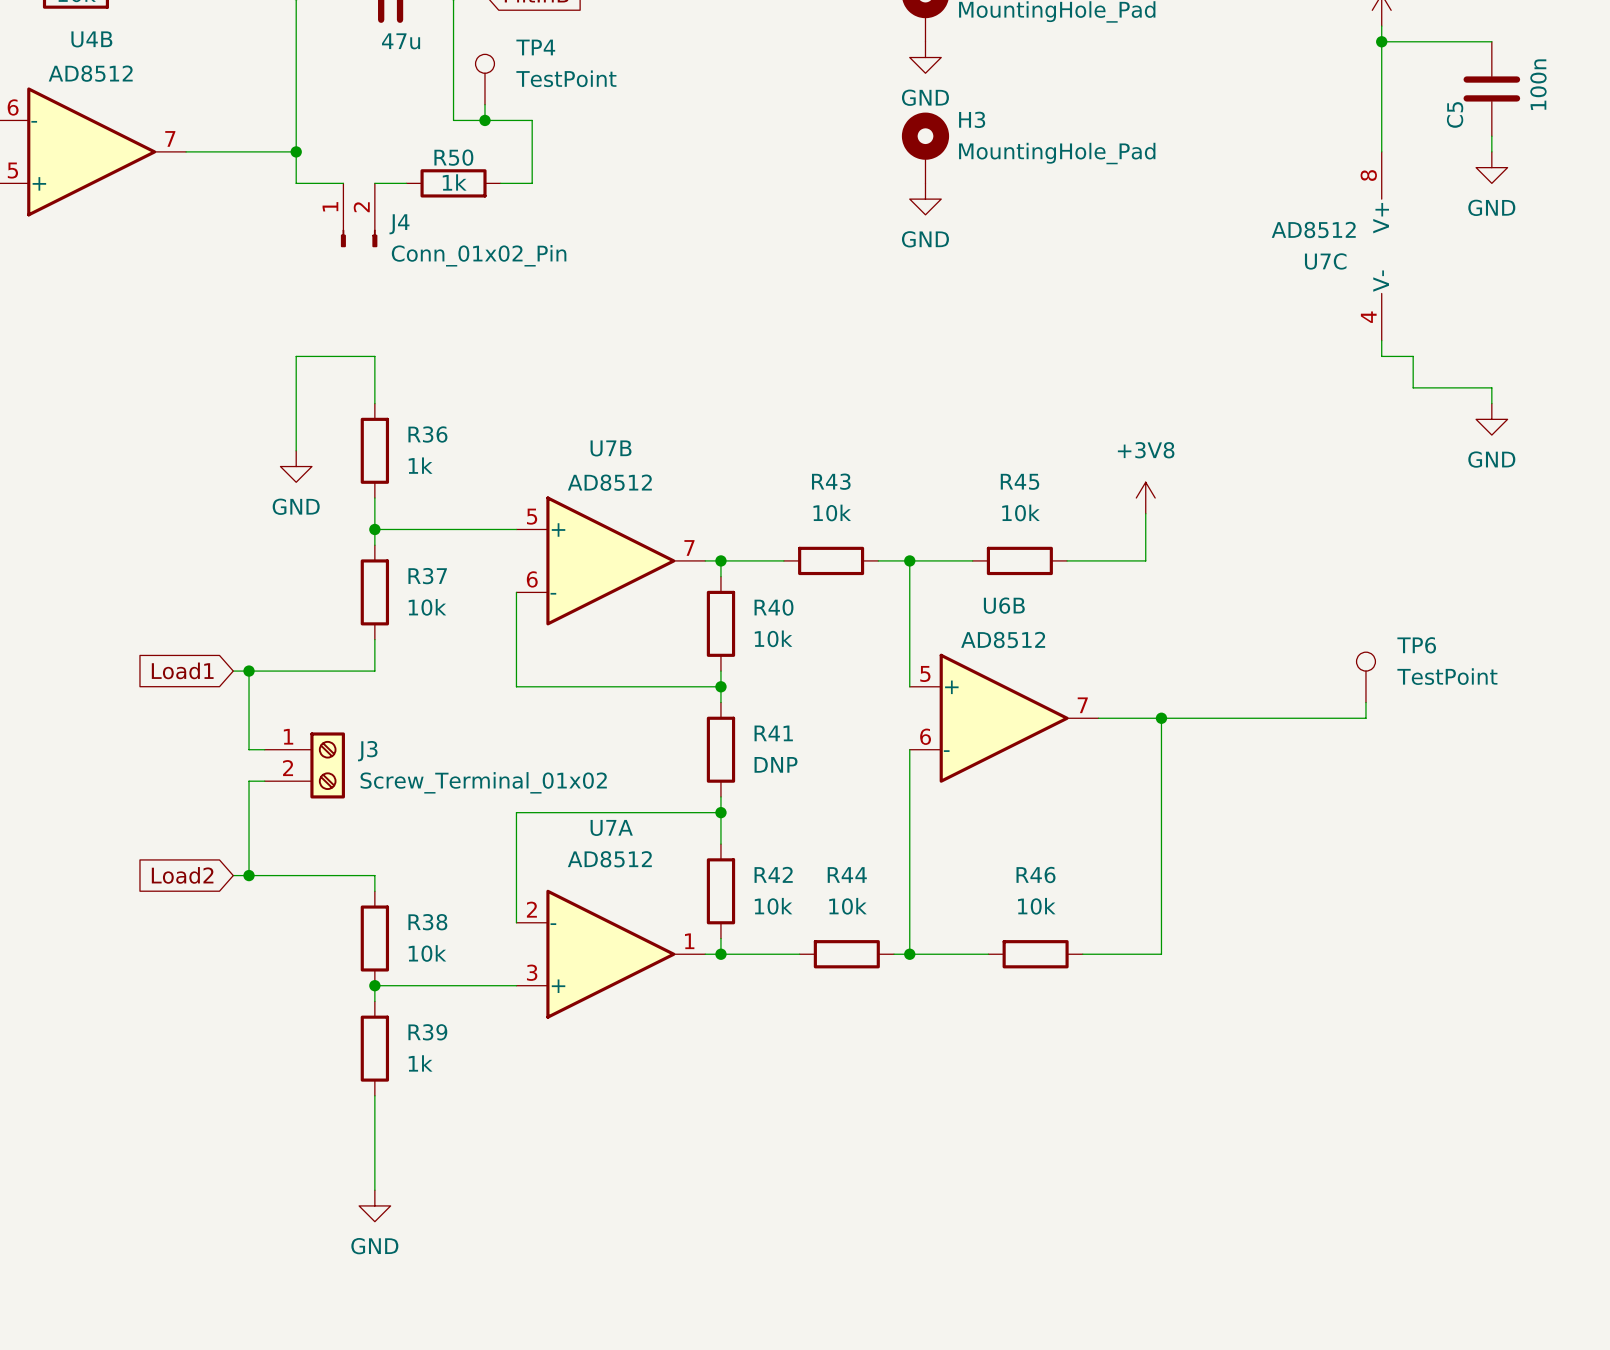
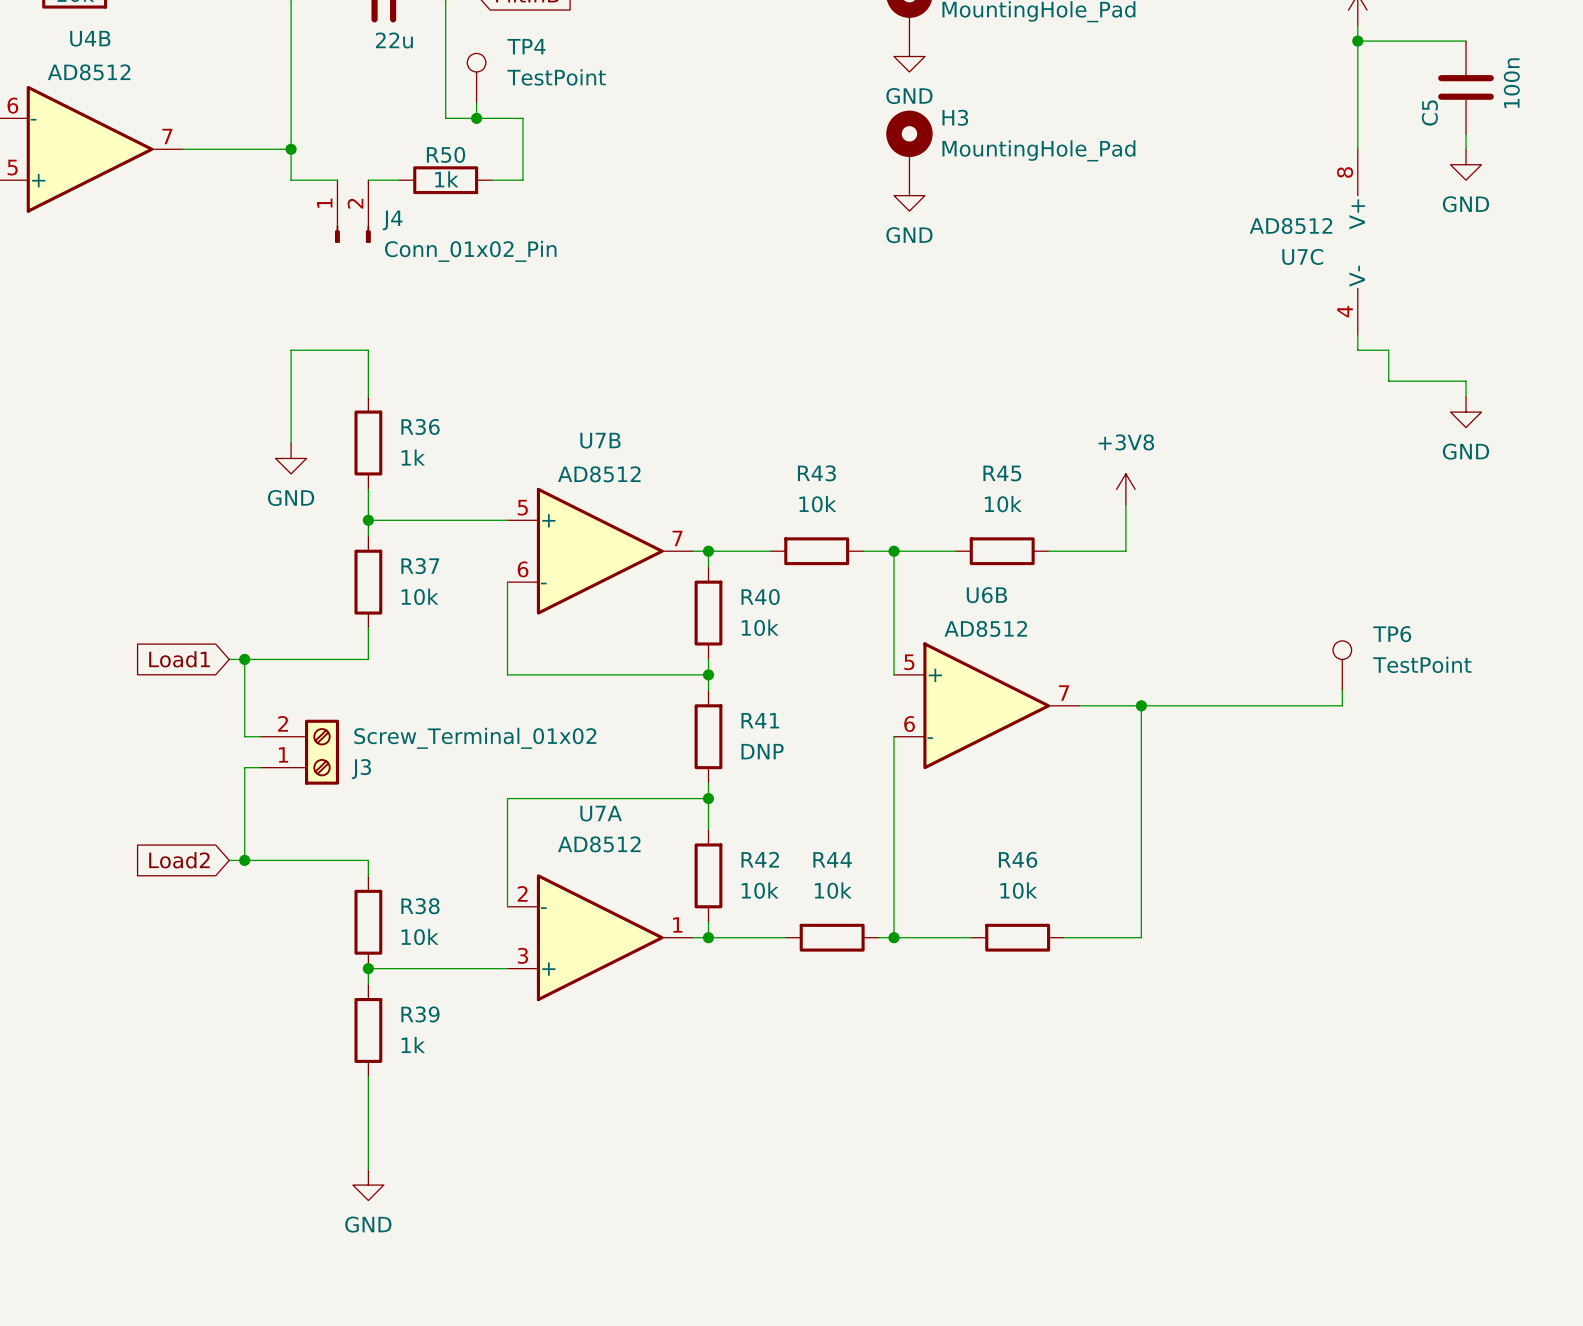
part value: 47u (401, 41) -> 22u (394, 40)
J3 flip: as is (327, 765) -> up-down (321, 752)

